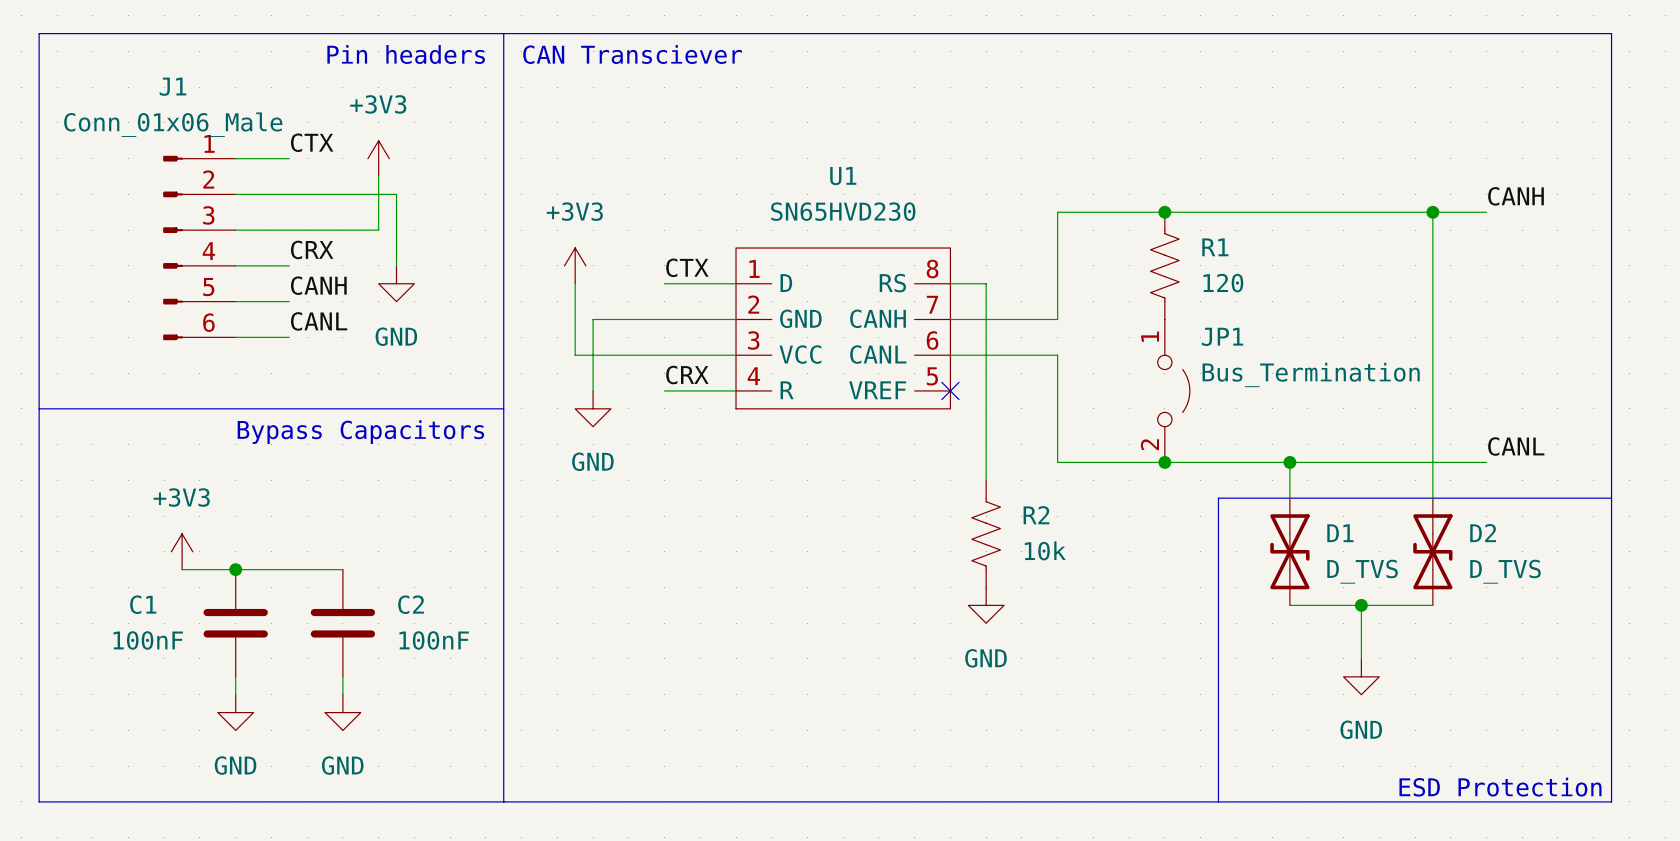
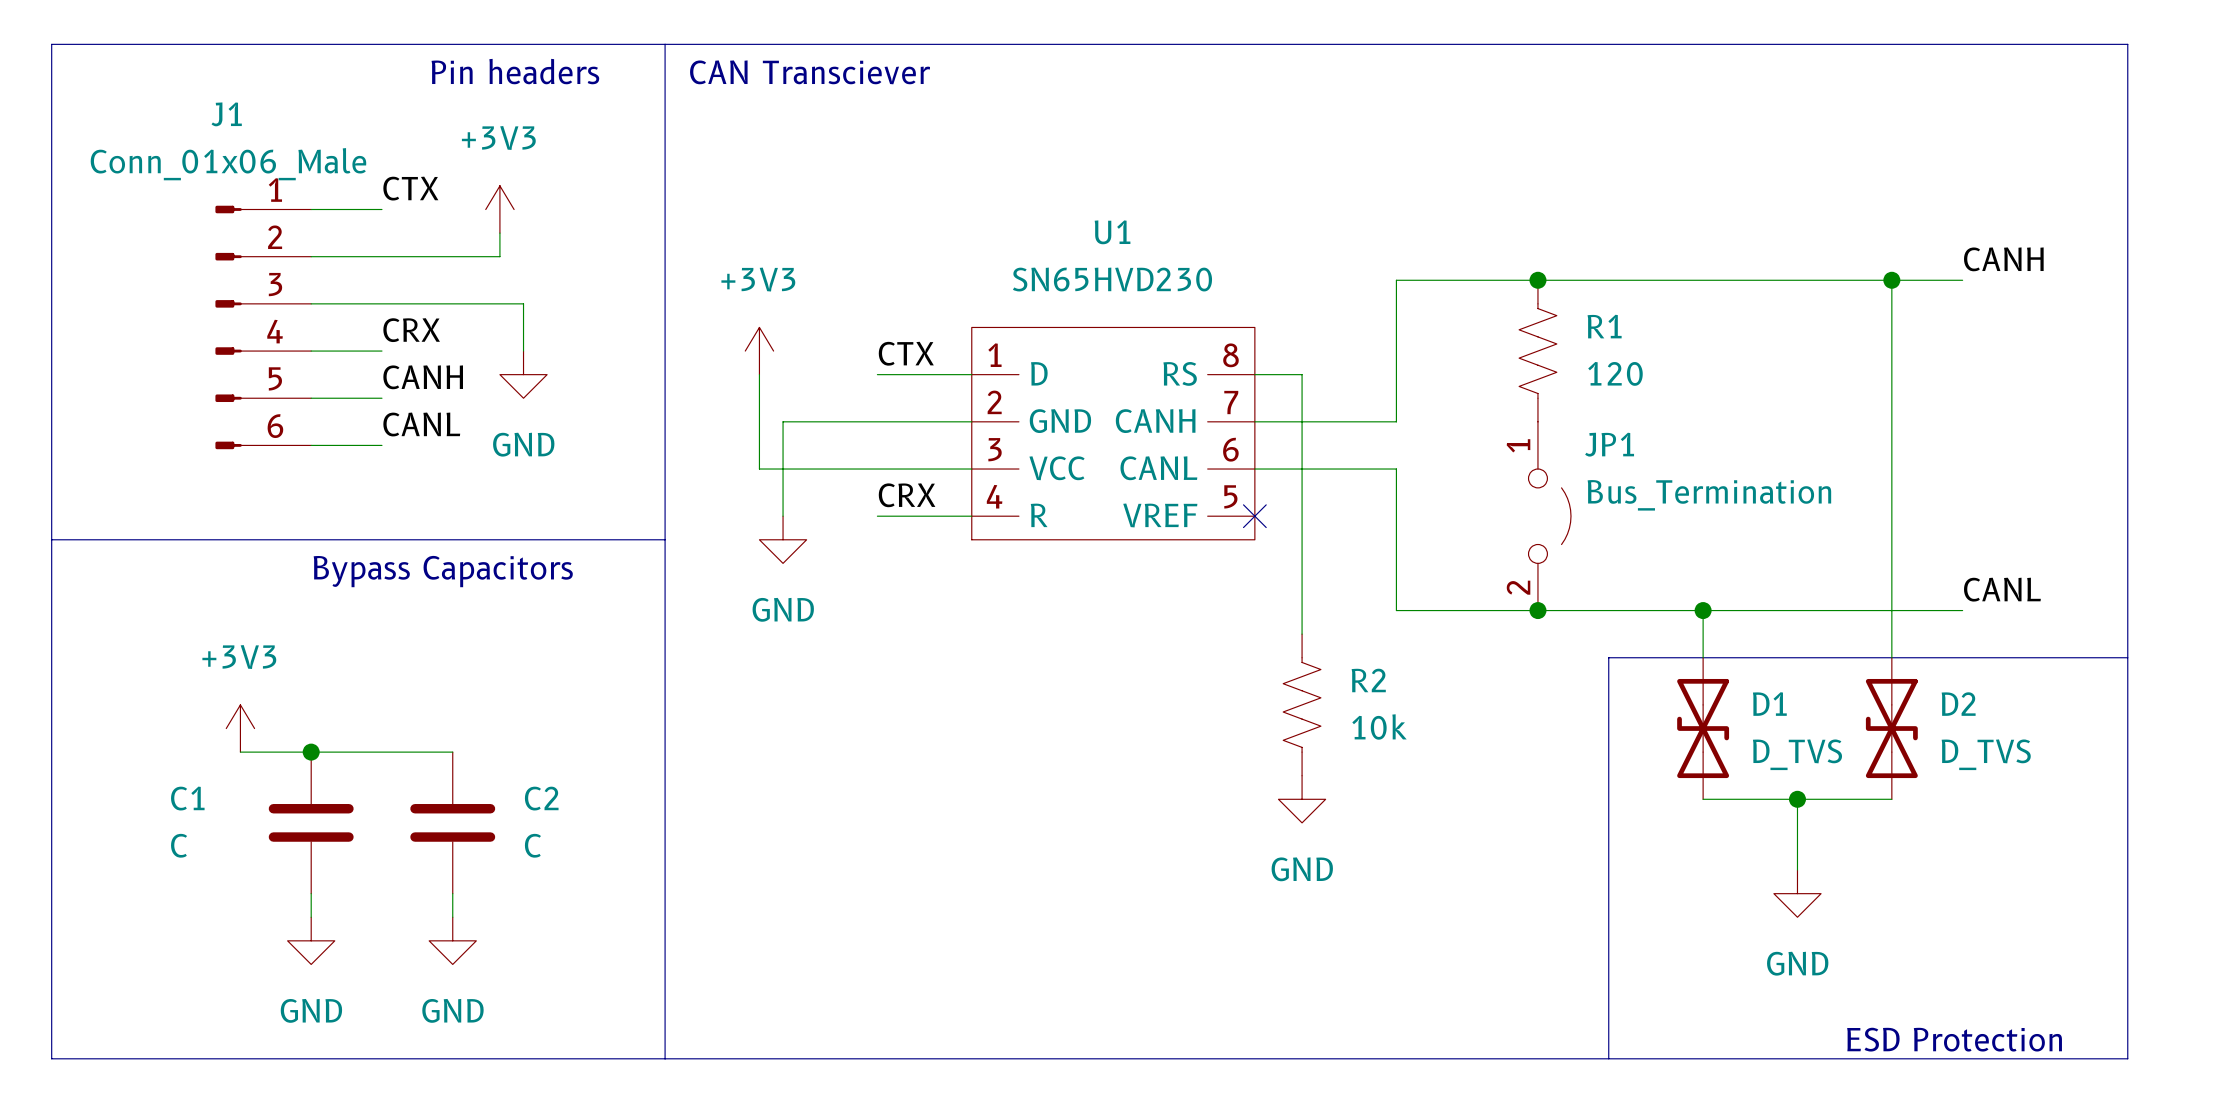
wire: (378, 230) (378, 194) (396, 194) (396, 230) -> (499, 303) (523, 303)
C1 value: 100nF (148, 640) -> C (179, 845)
C2 value: 100nF (434, 640) -> C (532, 845)

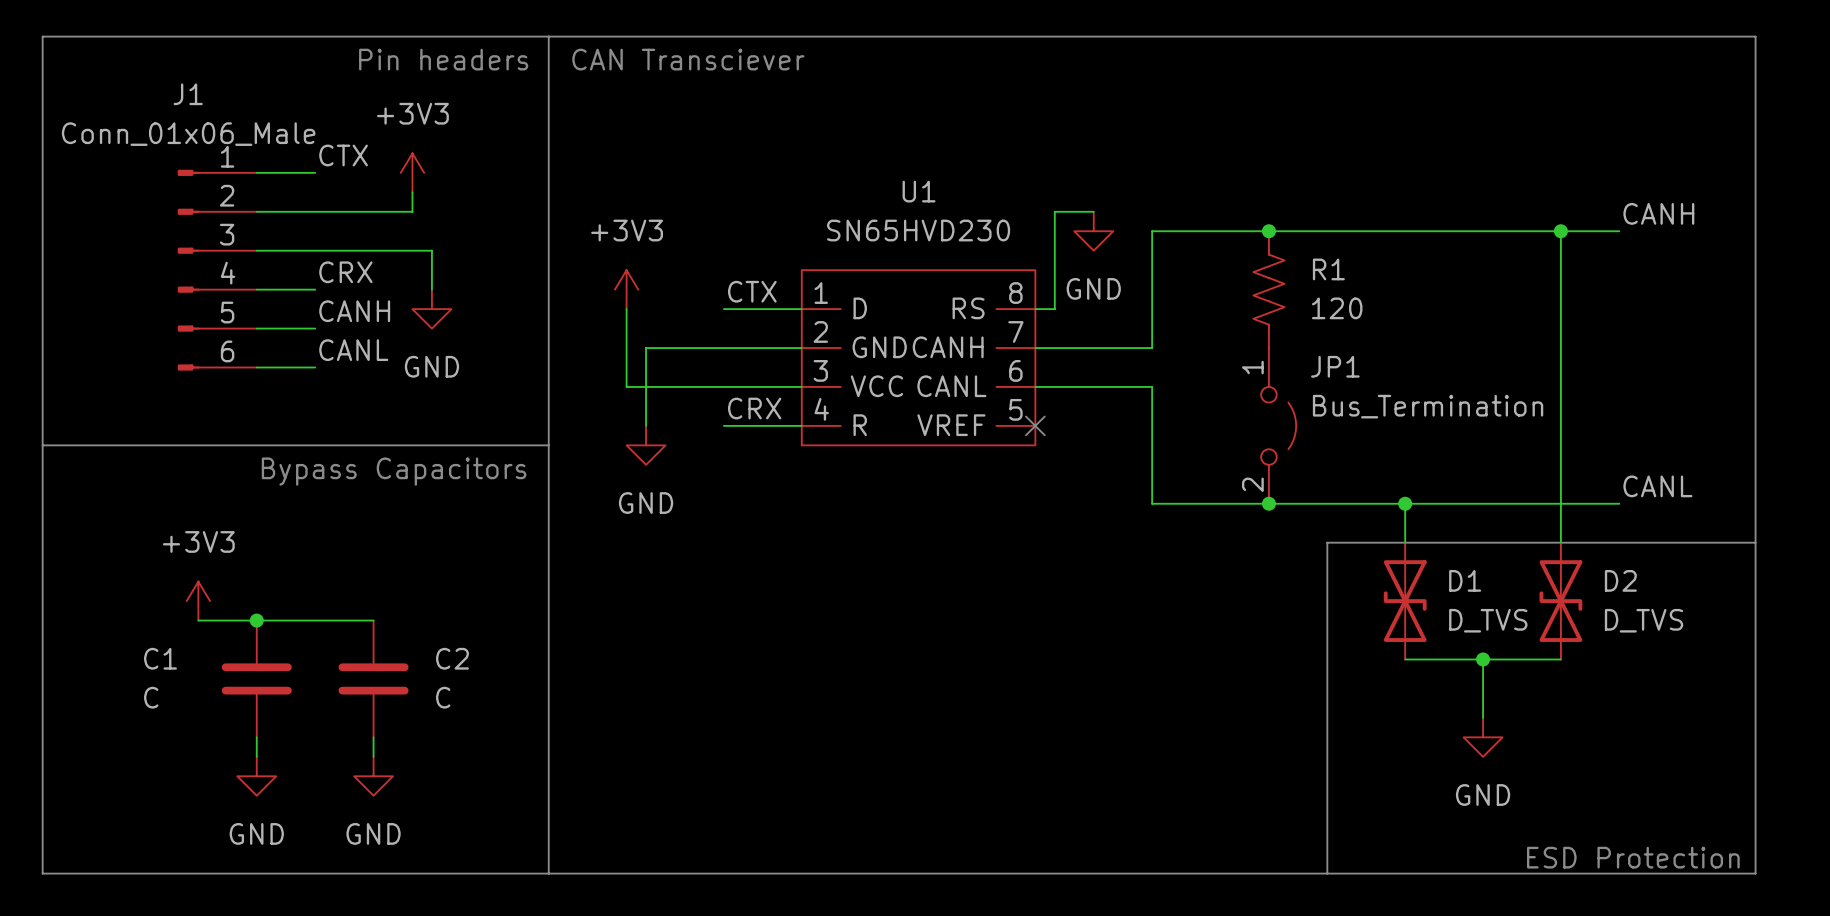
power symbol: none -> GND (1093, 231)
wire: (1278, 374) (1302, 374) (1302, 634) -> (1054, 309) (1054, 211) (1093, 211)
R2: 10k (1302, 704) -> none
power symbol: GND (1302, 799) -> none

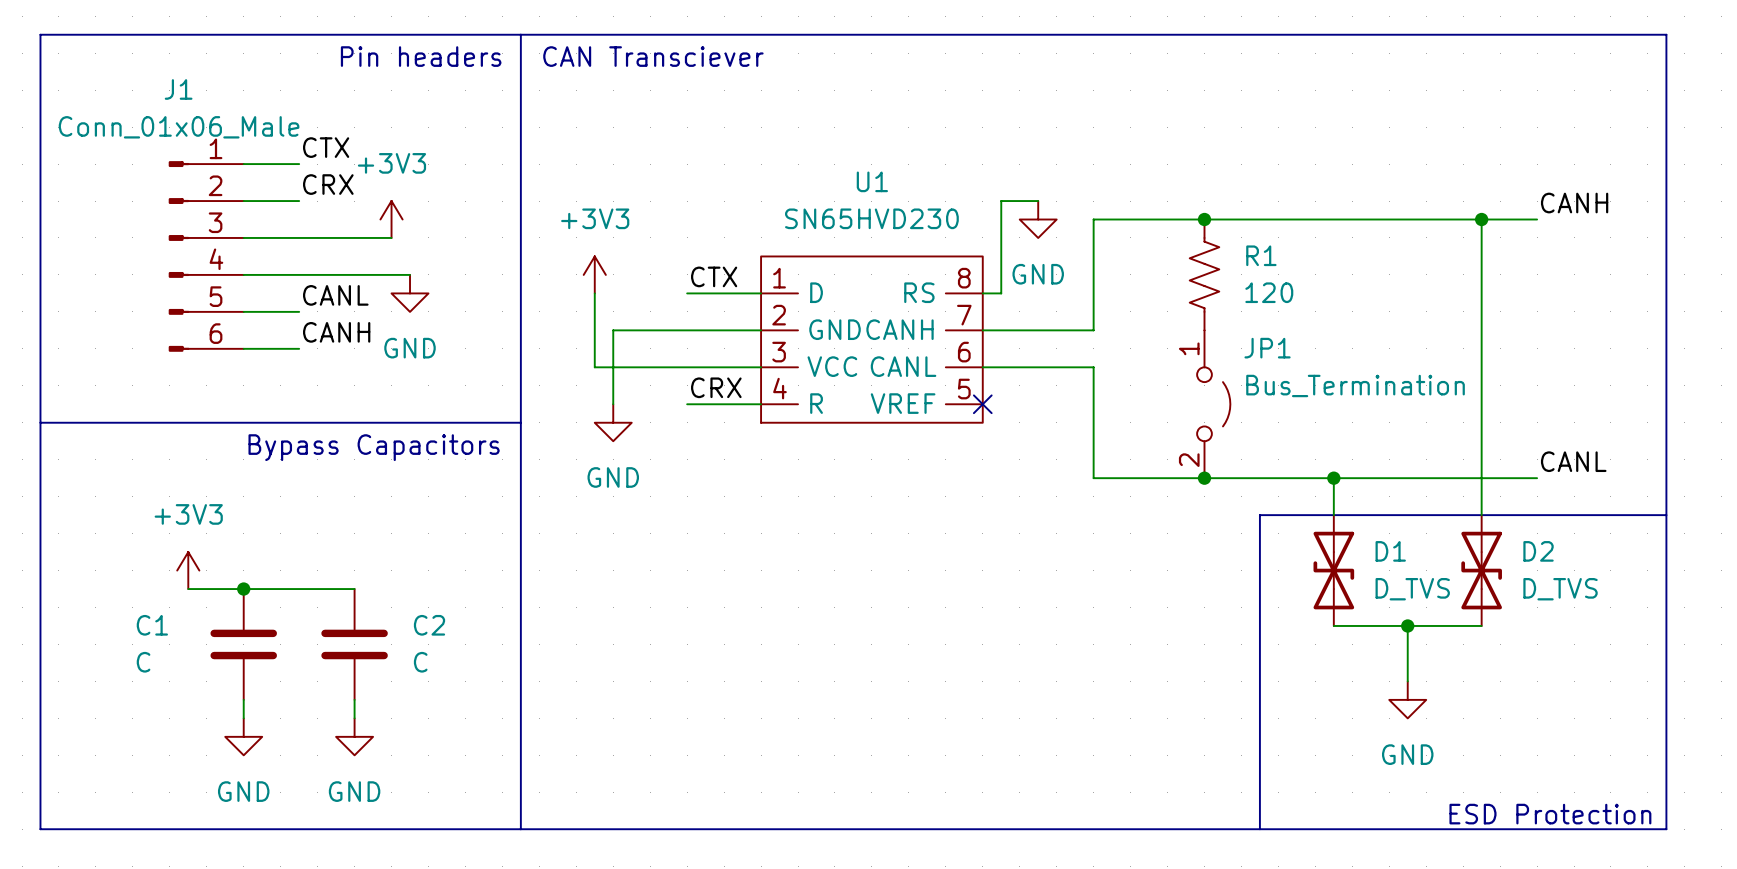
power symbol position: +3V3 (412, 172) -> +3V3 (391, 219)
wire: (412, 192) (412, 211) (315, 211) -> none
wire: (412, 250) (431, 250) (431, 289) -> (299, 274) (410, 274)
label position: CRX (345, 272) -> CRX (328, 184)
label: CANH (354, 311) -> CANL (335, 295)
label: CANL (353, 350) -> CANH (336, 332)

